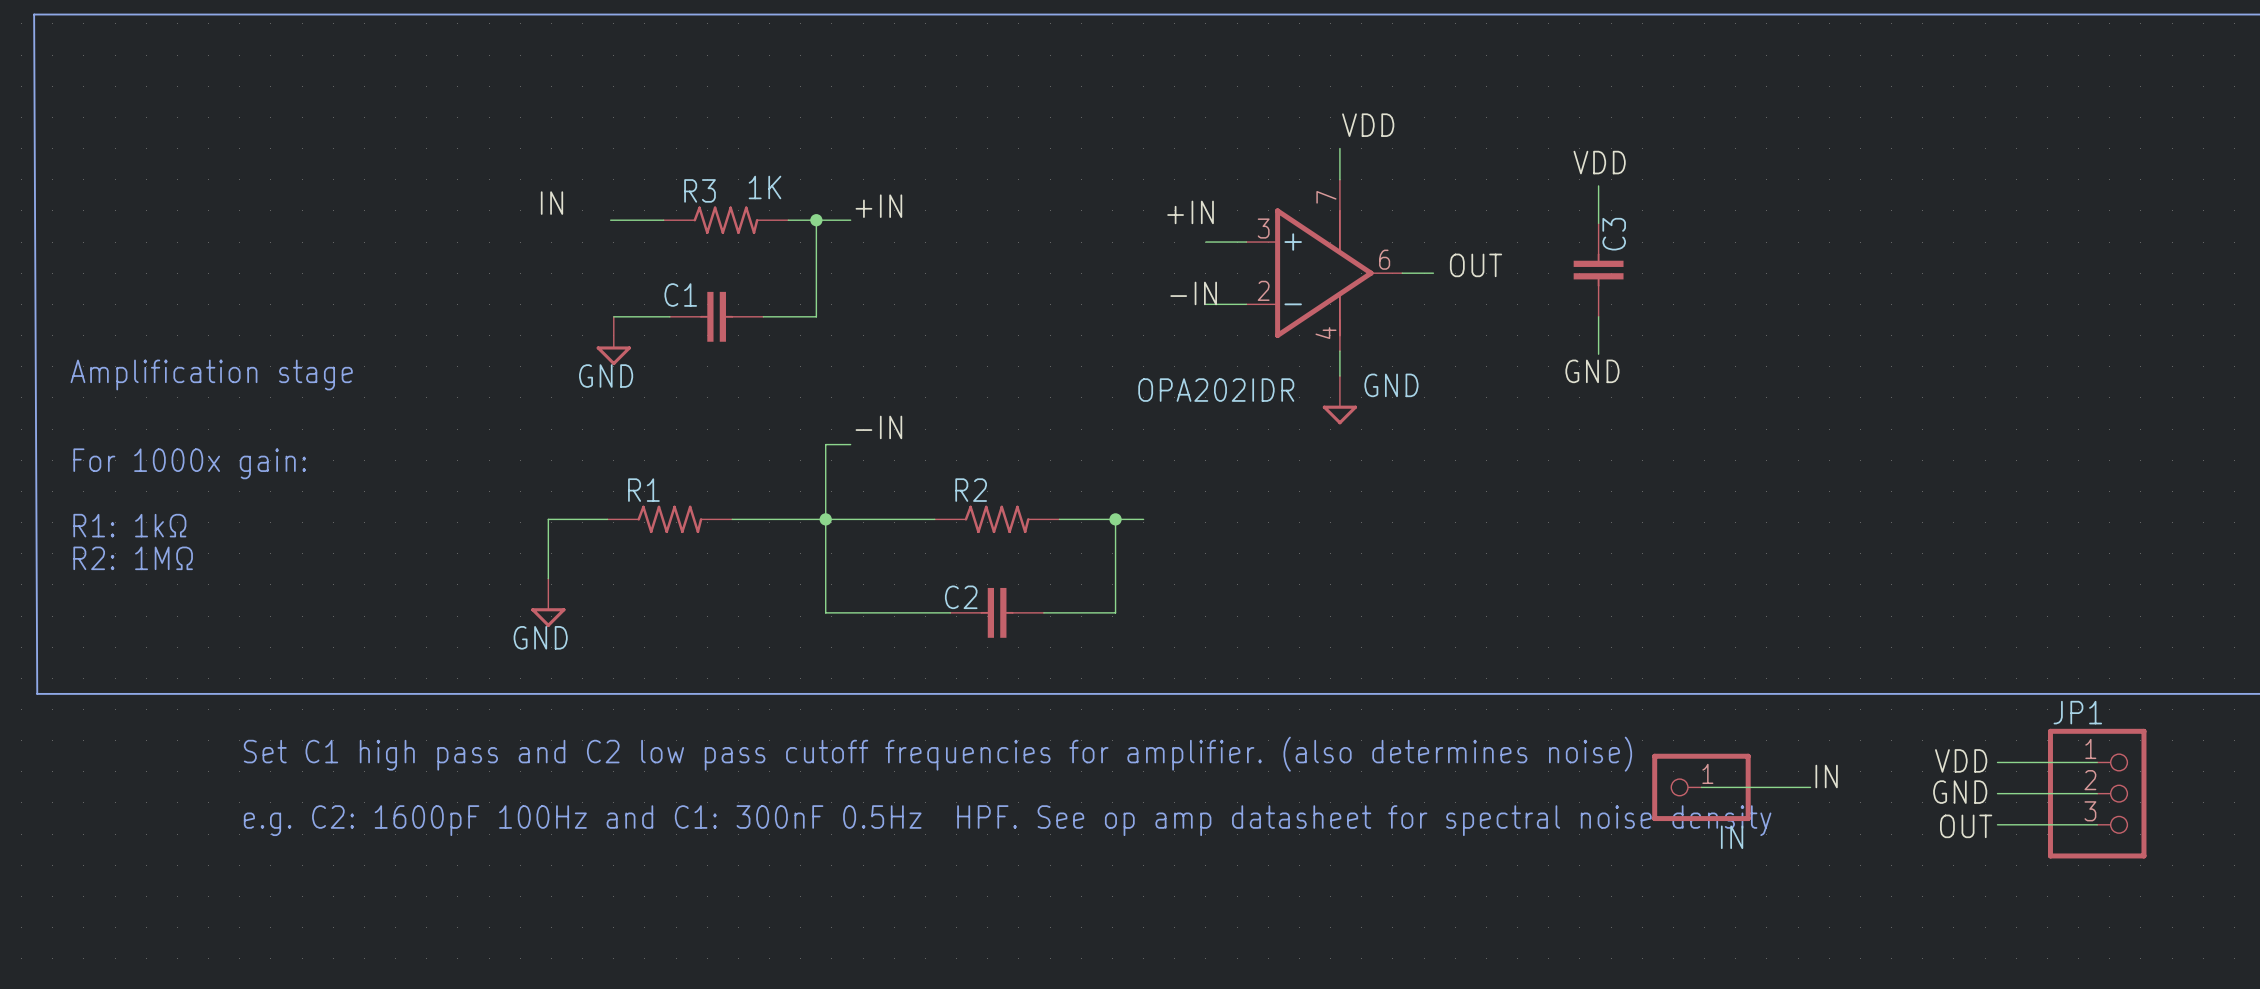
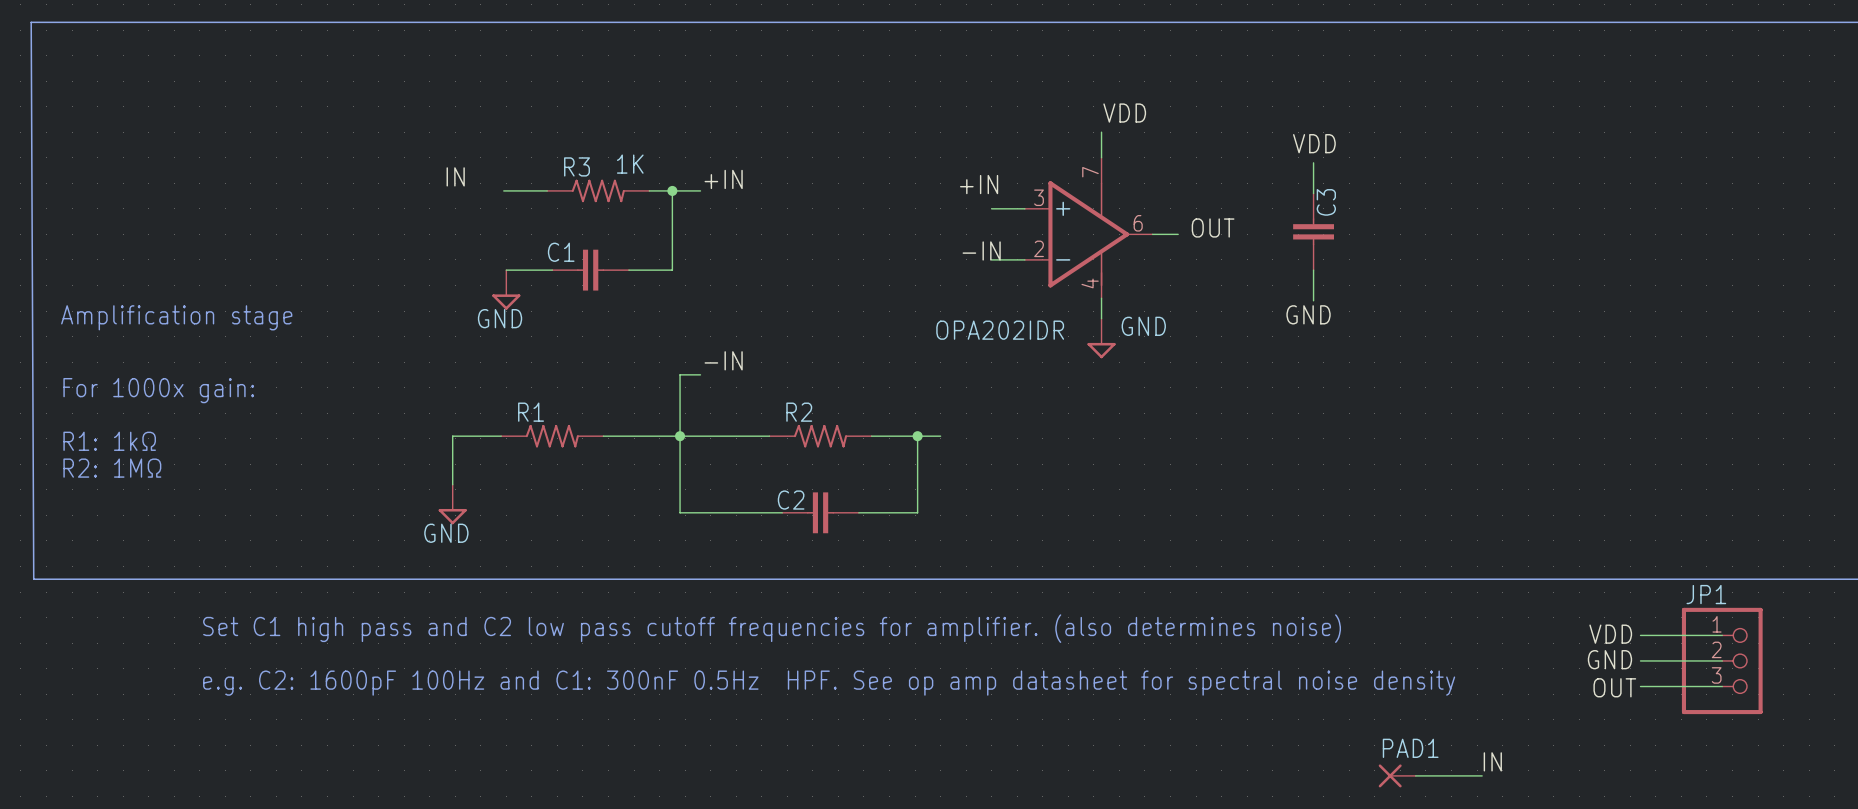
label position: IN (1826, 776) -> IN (1492, 761)
wire: (1701, 787) (1810, 787) -> none
IN: (1701, 787) -> none
PAD1: none -> (1397, 775)
wire: none -> (1415, 775) (1482, 775)

